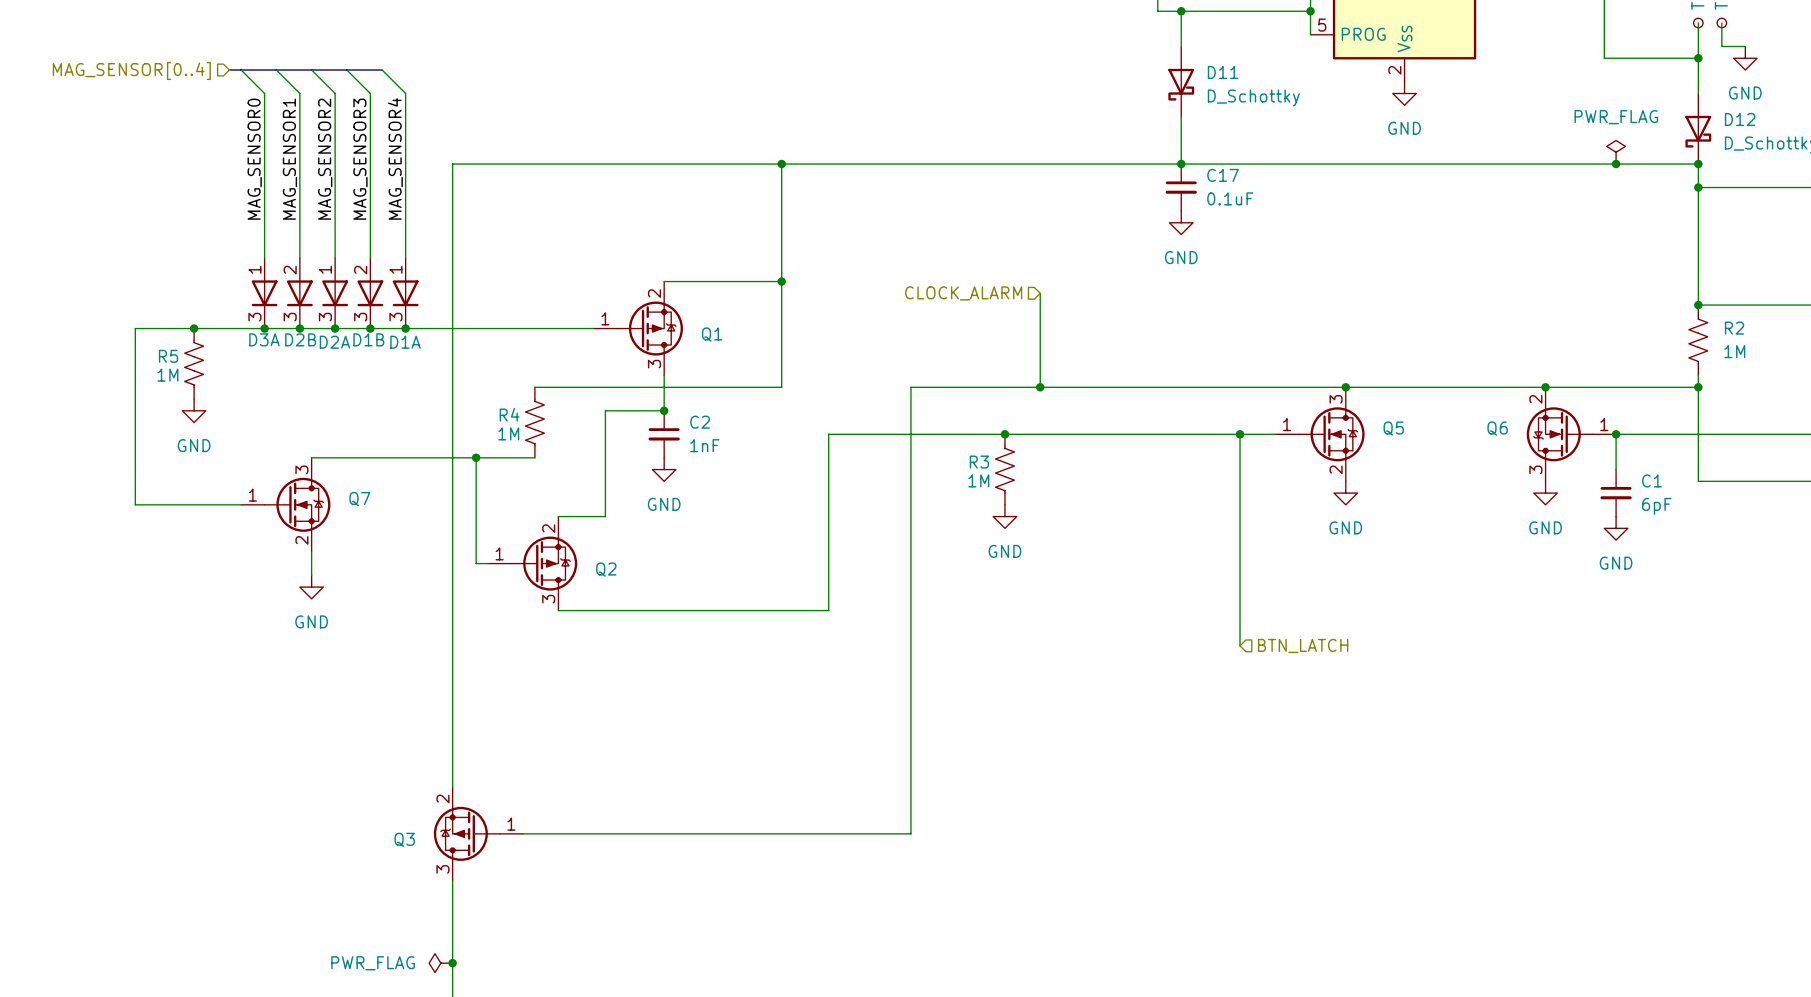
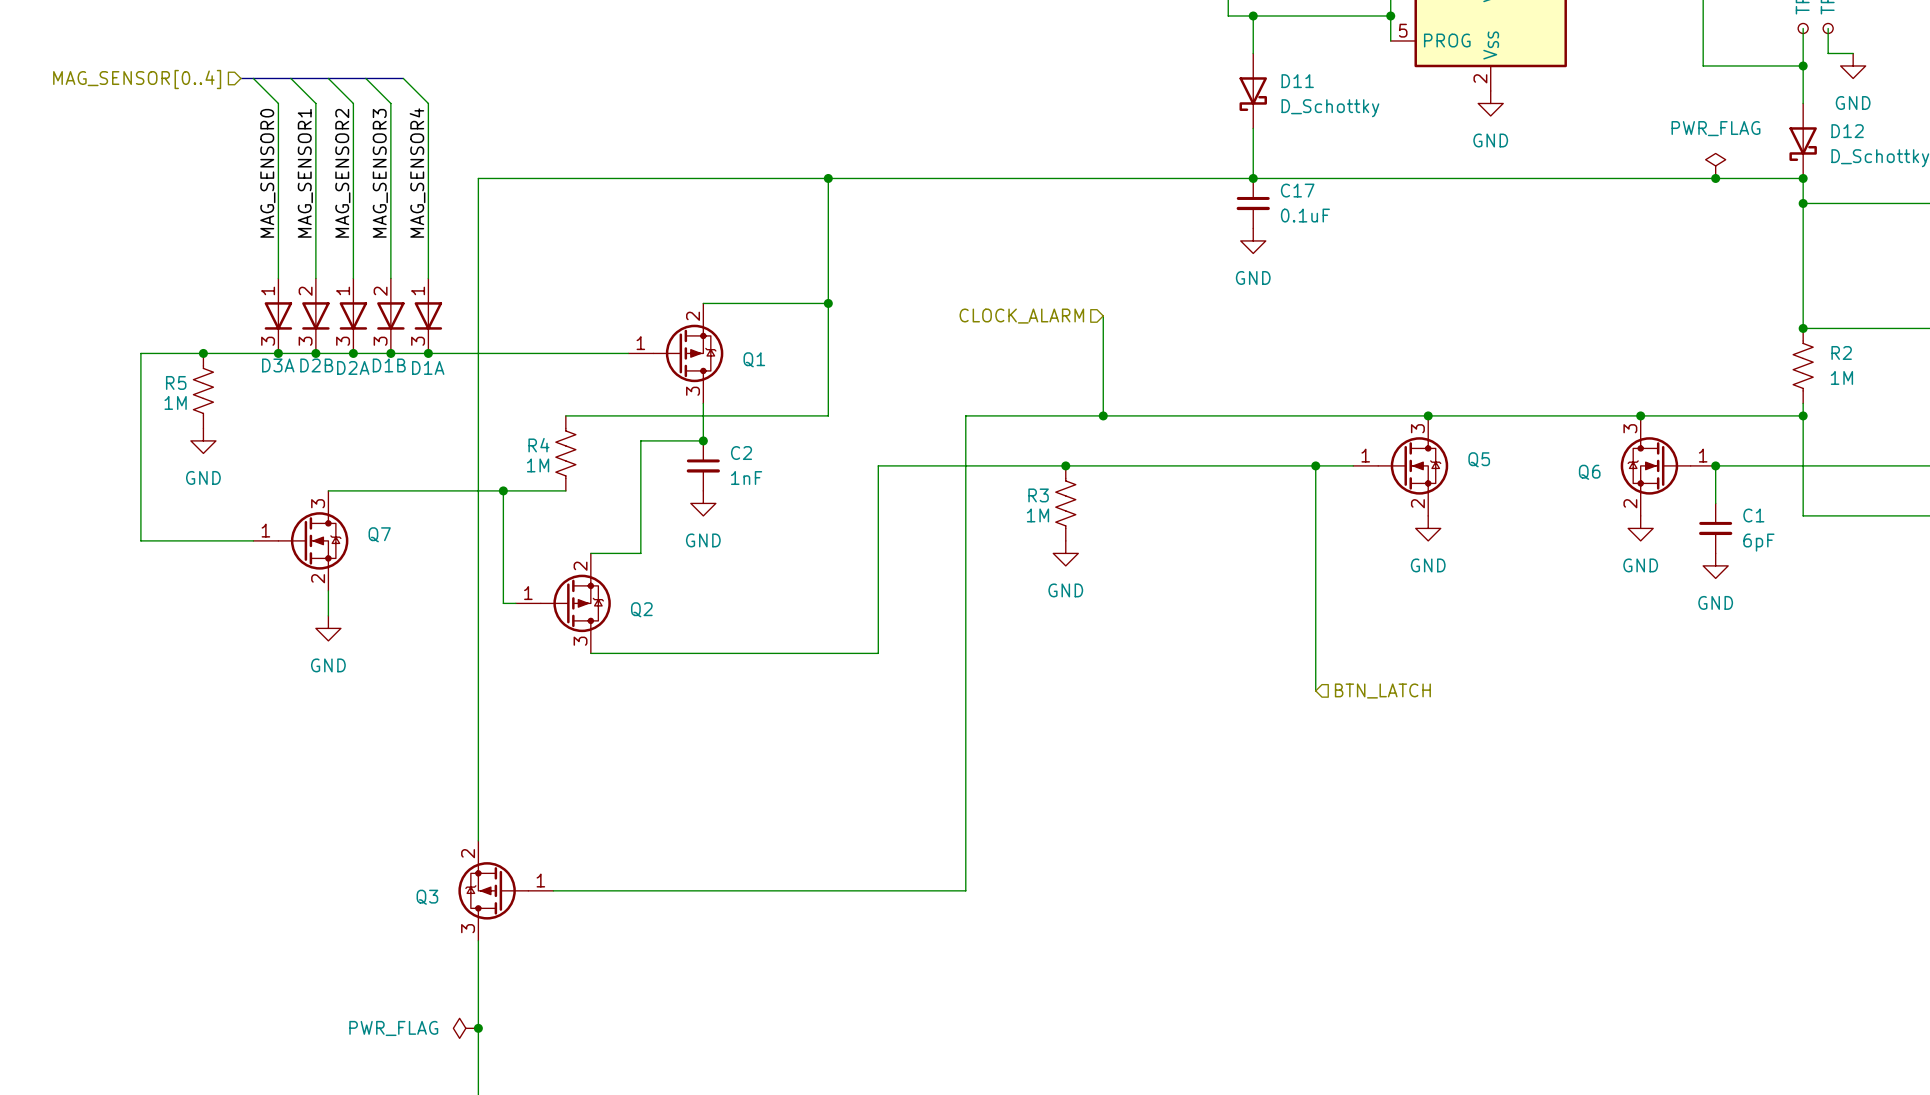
Q6 flip: as is (1559, 434) -> up-down (1655, 465)

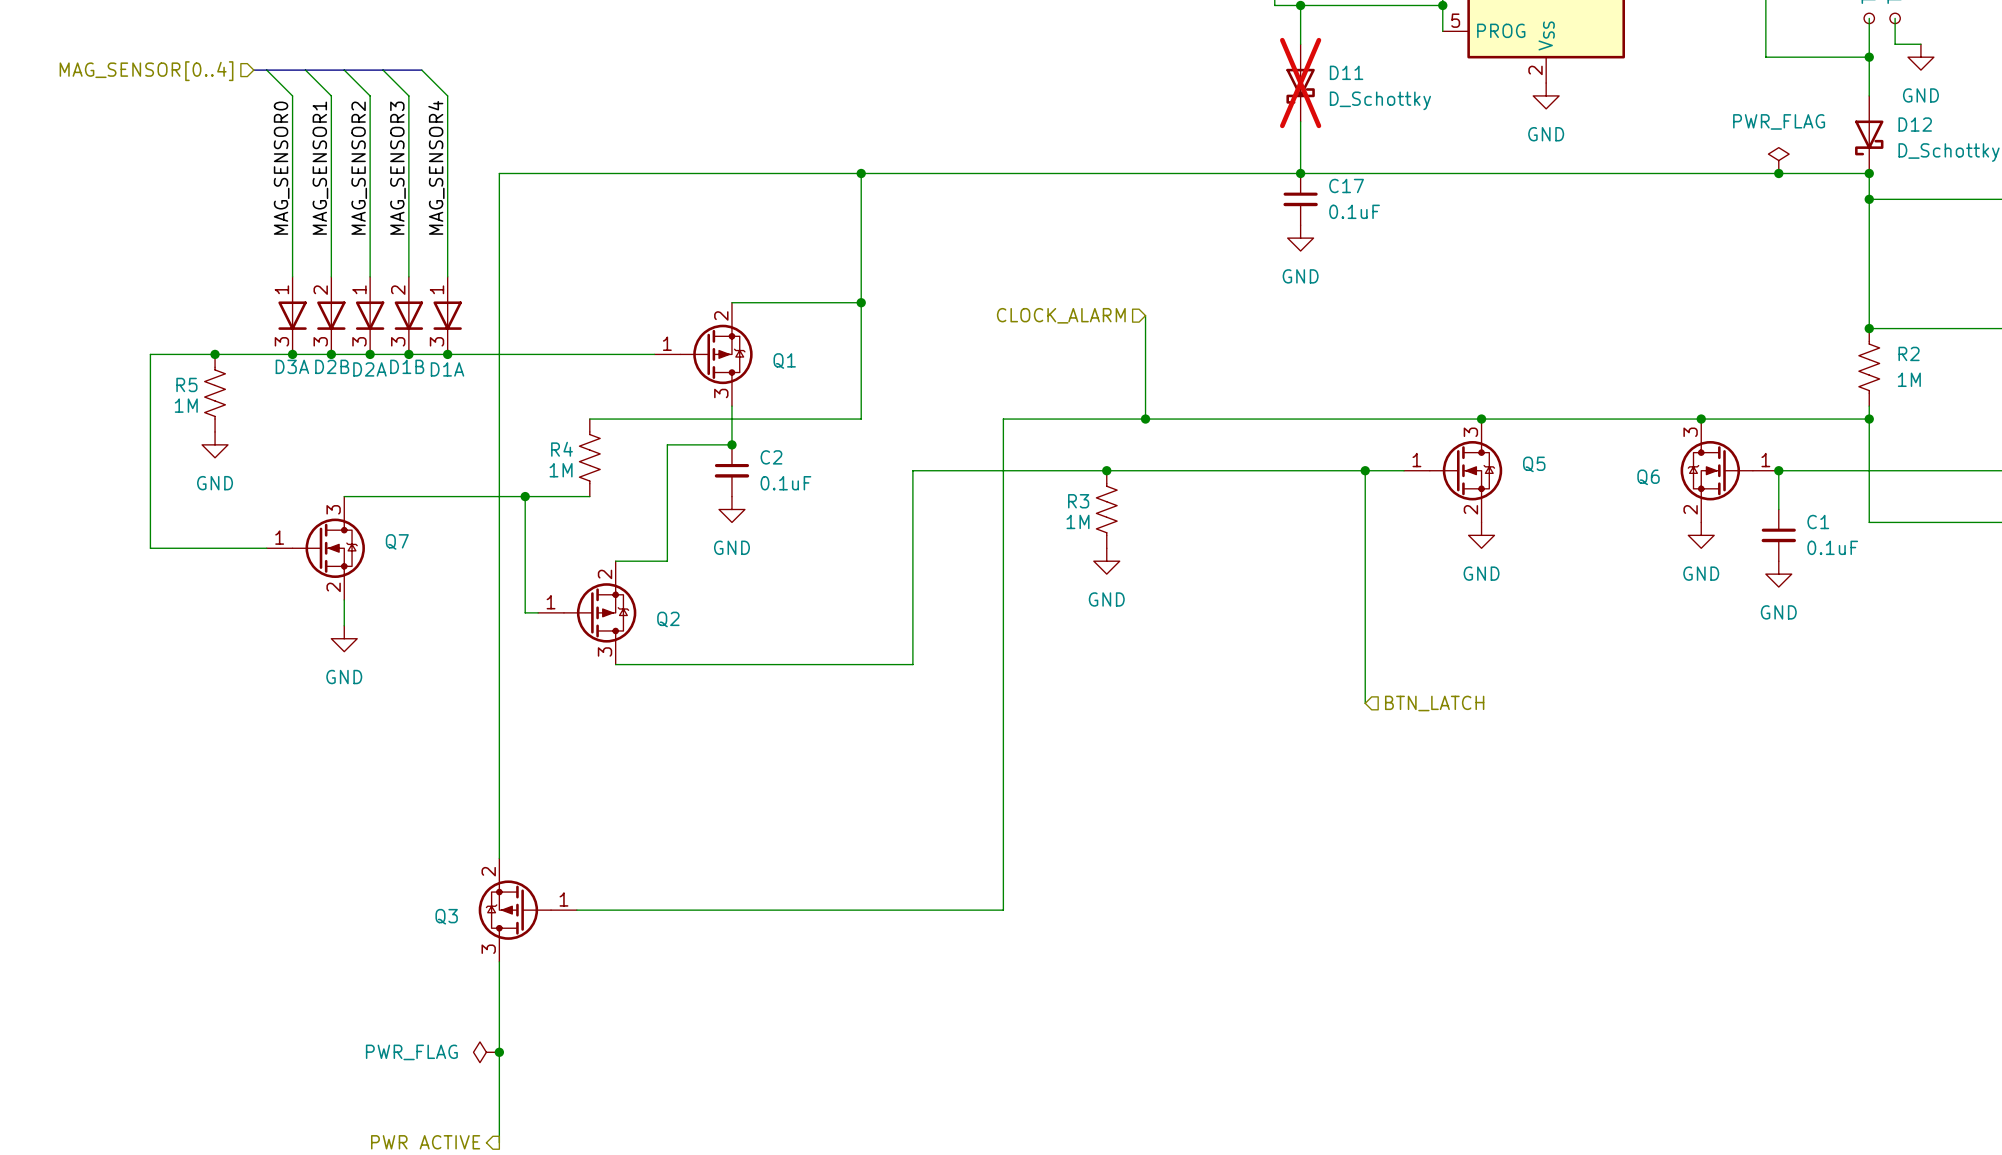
D11 do-not-place cross: none -> (1300, 83)
C2 value: 1nF (746, 478) -> 0.1uF (785, 483)
C1 value: 6pF (1758, 542) -> 0.1uF (1832, 547)

